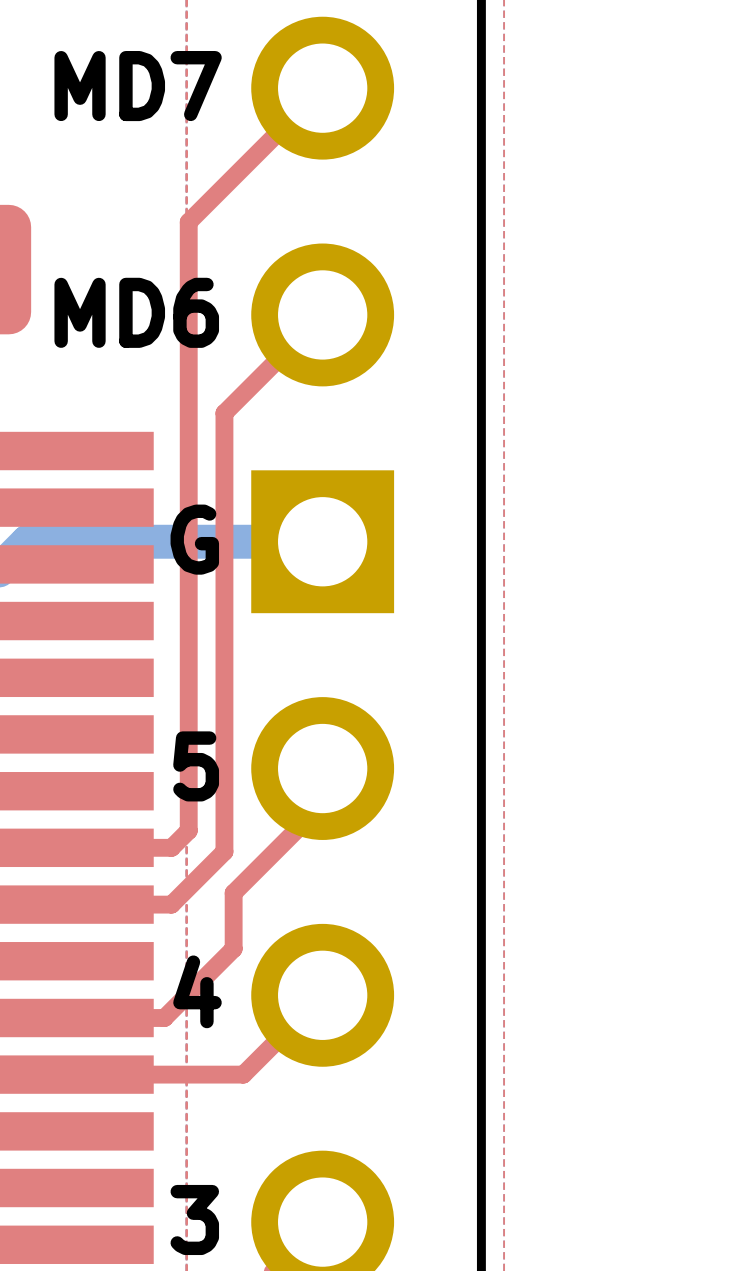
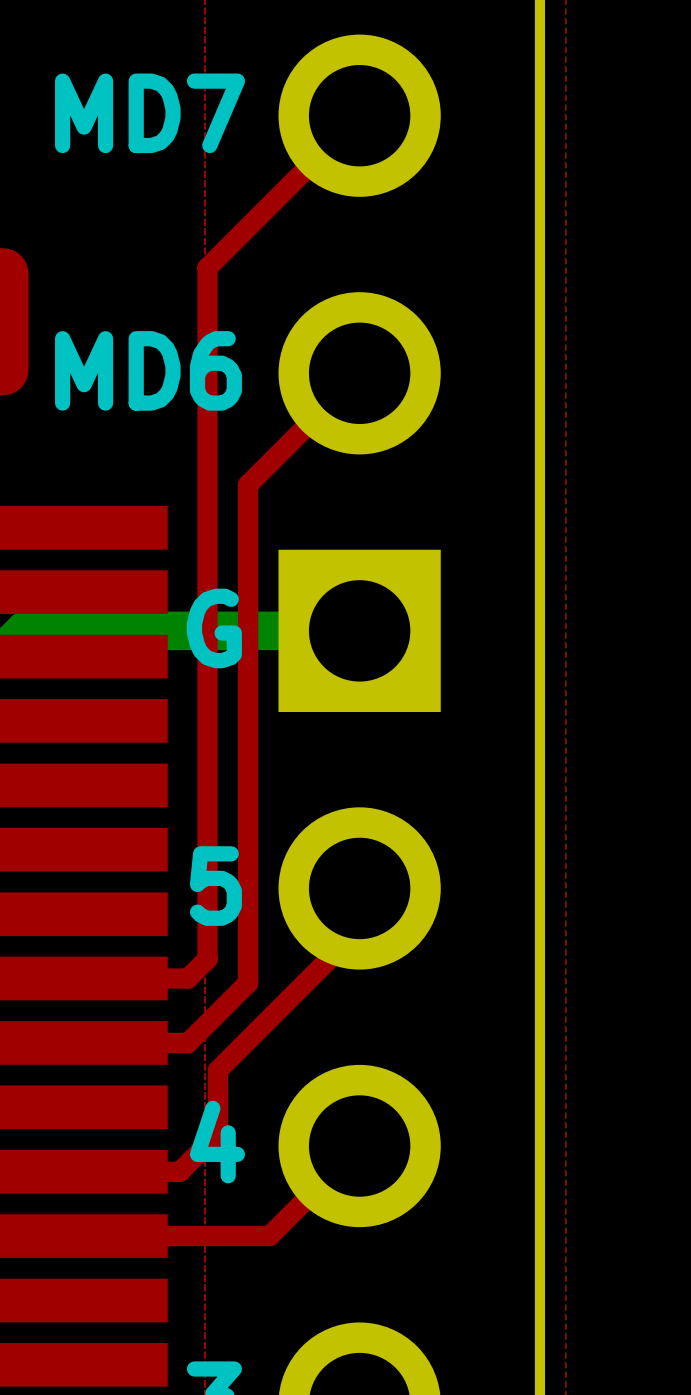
top track: (233, 893) (233, 948) (197, 984) -> (258, 1029) (217, 1070) (217, 1133)

